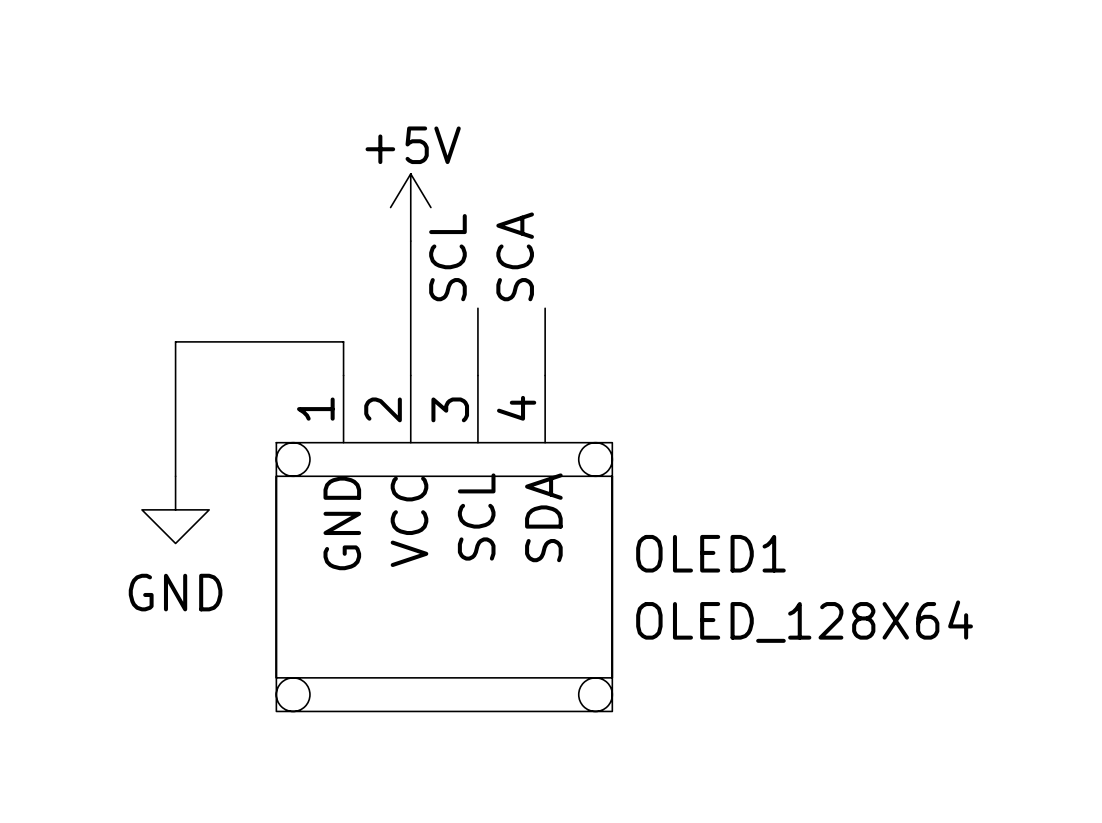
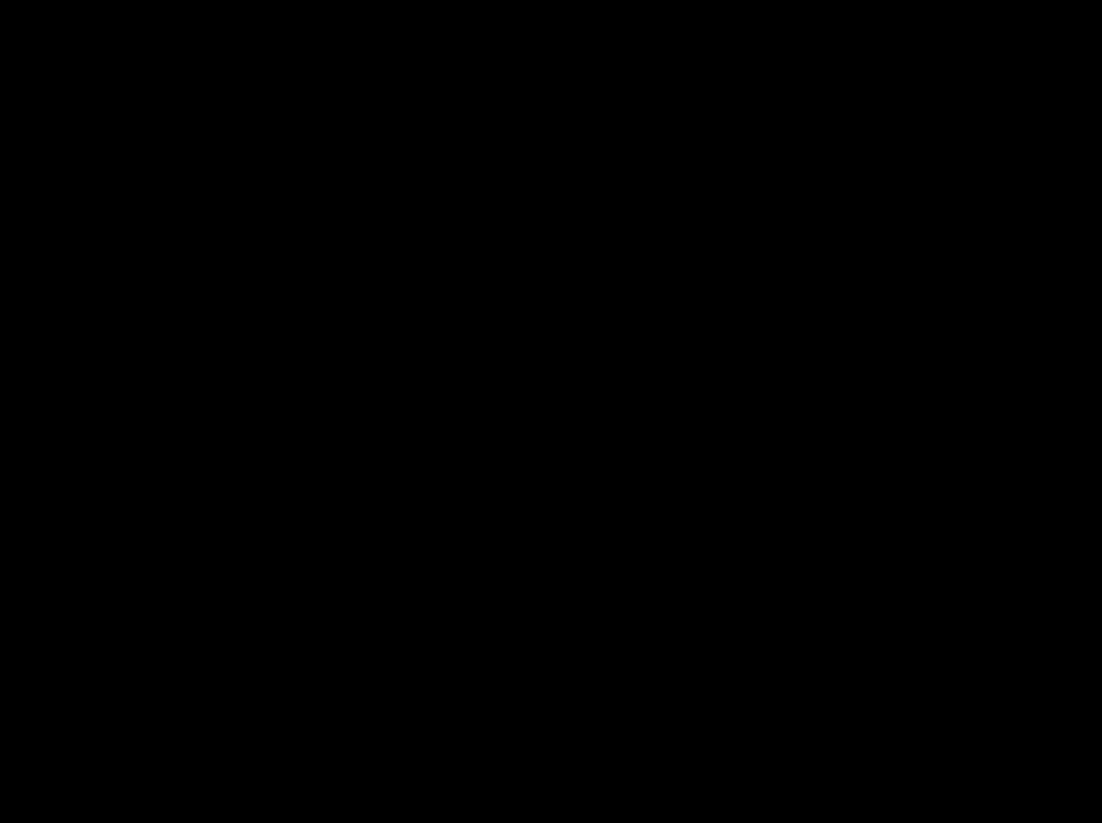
power symbol: +5V (410, 207) -> none
wire: (410, 241) (410, 375) -> none
label: SCA (515, 256) -> none
label: SCL (447, 257) -> none
wire: (477, 308) (477, 375) -> none
wire: (545, 308) (545, 375) -> none
wire: (343, 375) (343, 341) (175, 341) (175, 476) -> none
power symbol: GND (175, 509) -> none
OLED1: OLED_128X64 (444, 543) -> none

